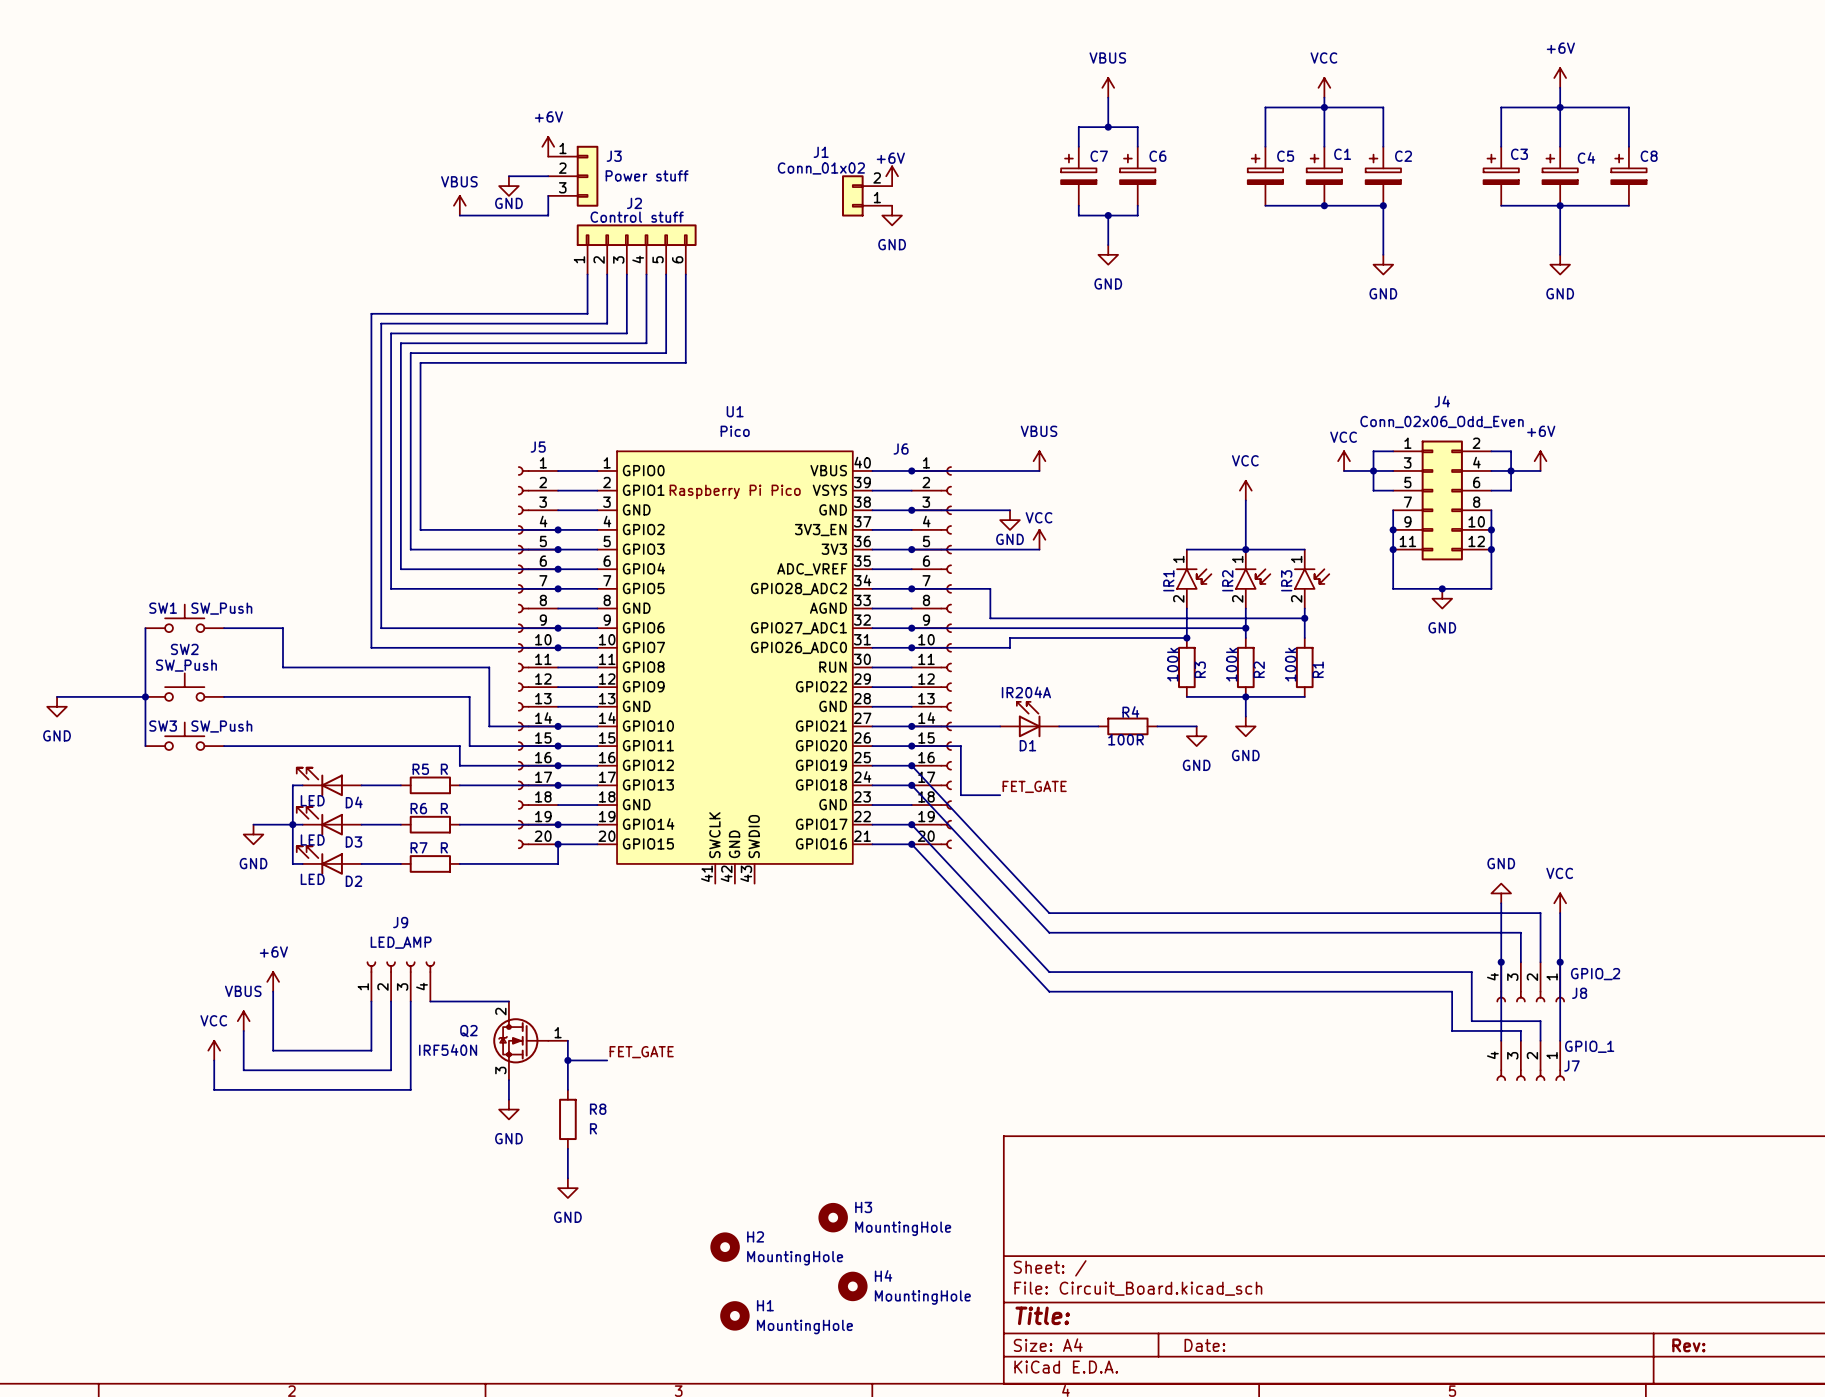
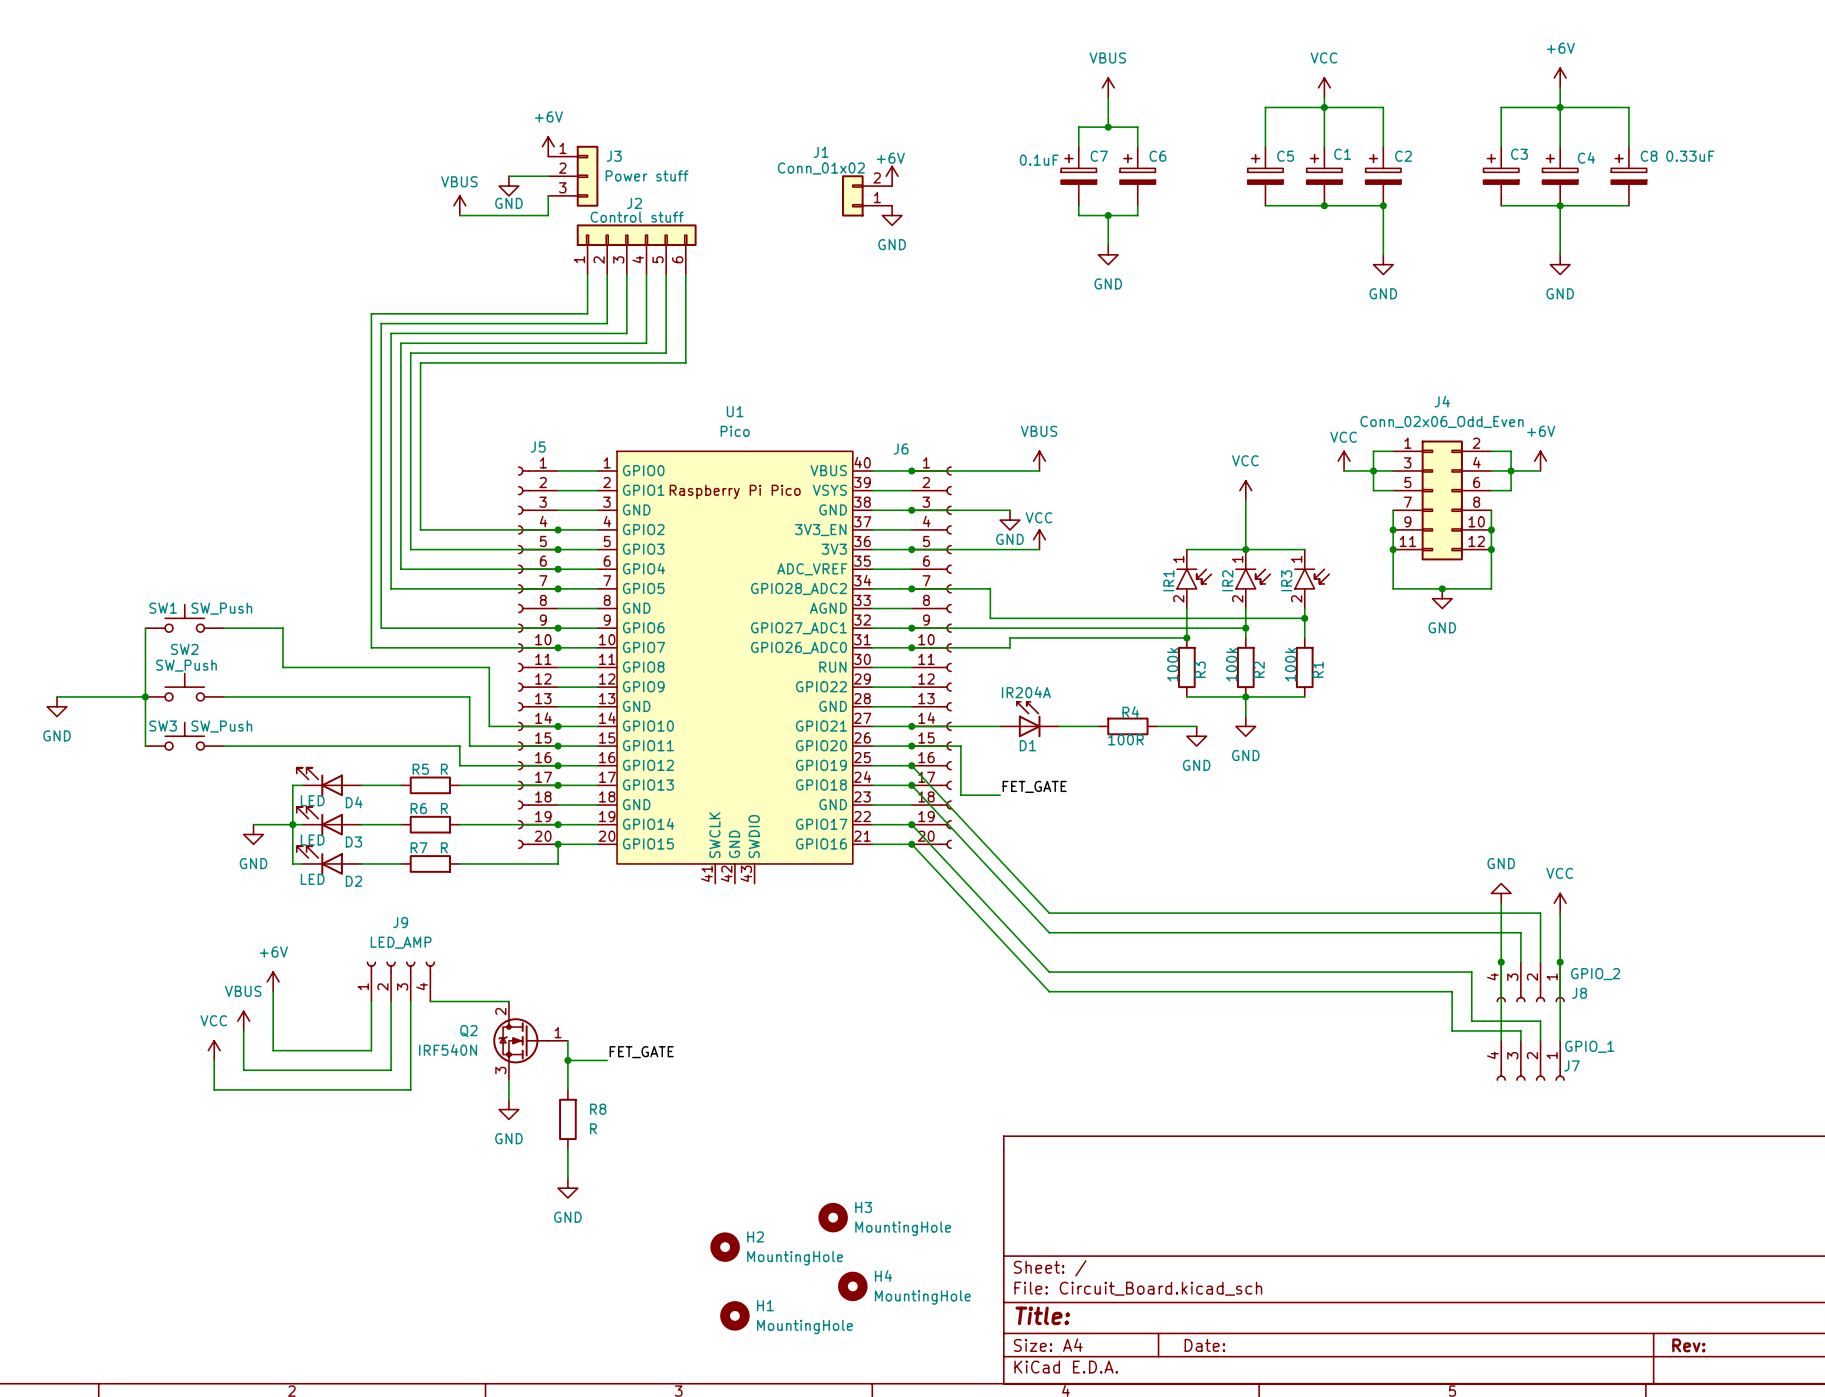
C8 value: none -> 0.33uF (1690, 156)
C7 value: none -> 0.1uF (1039, 160)

